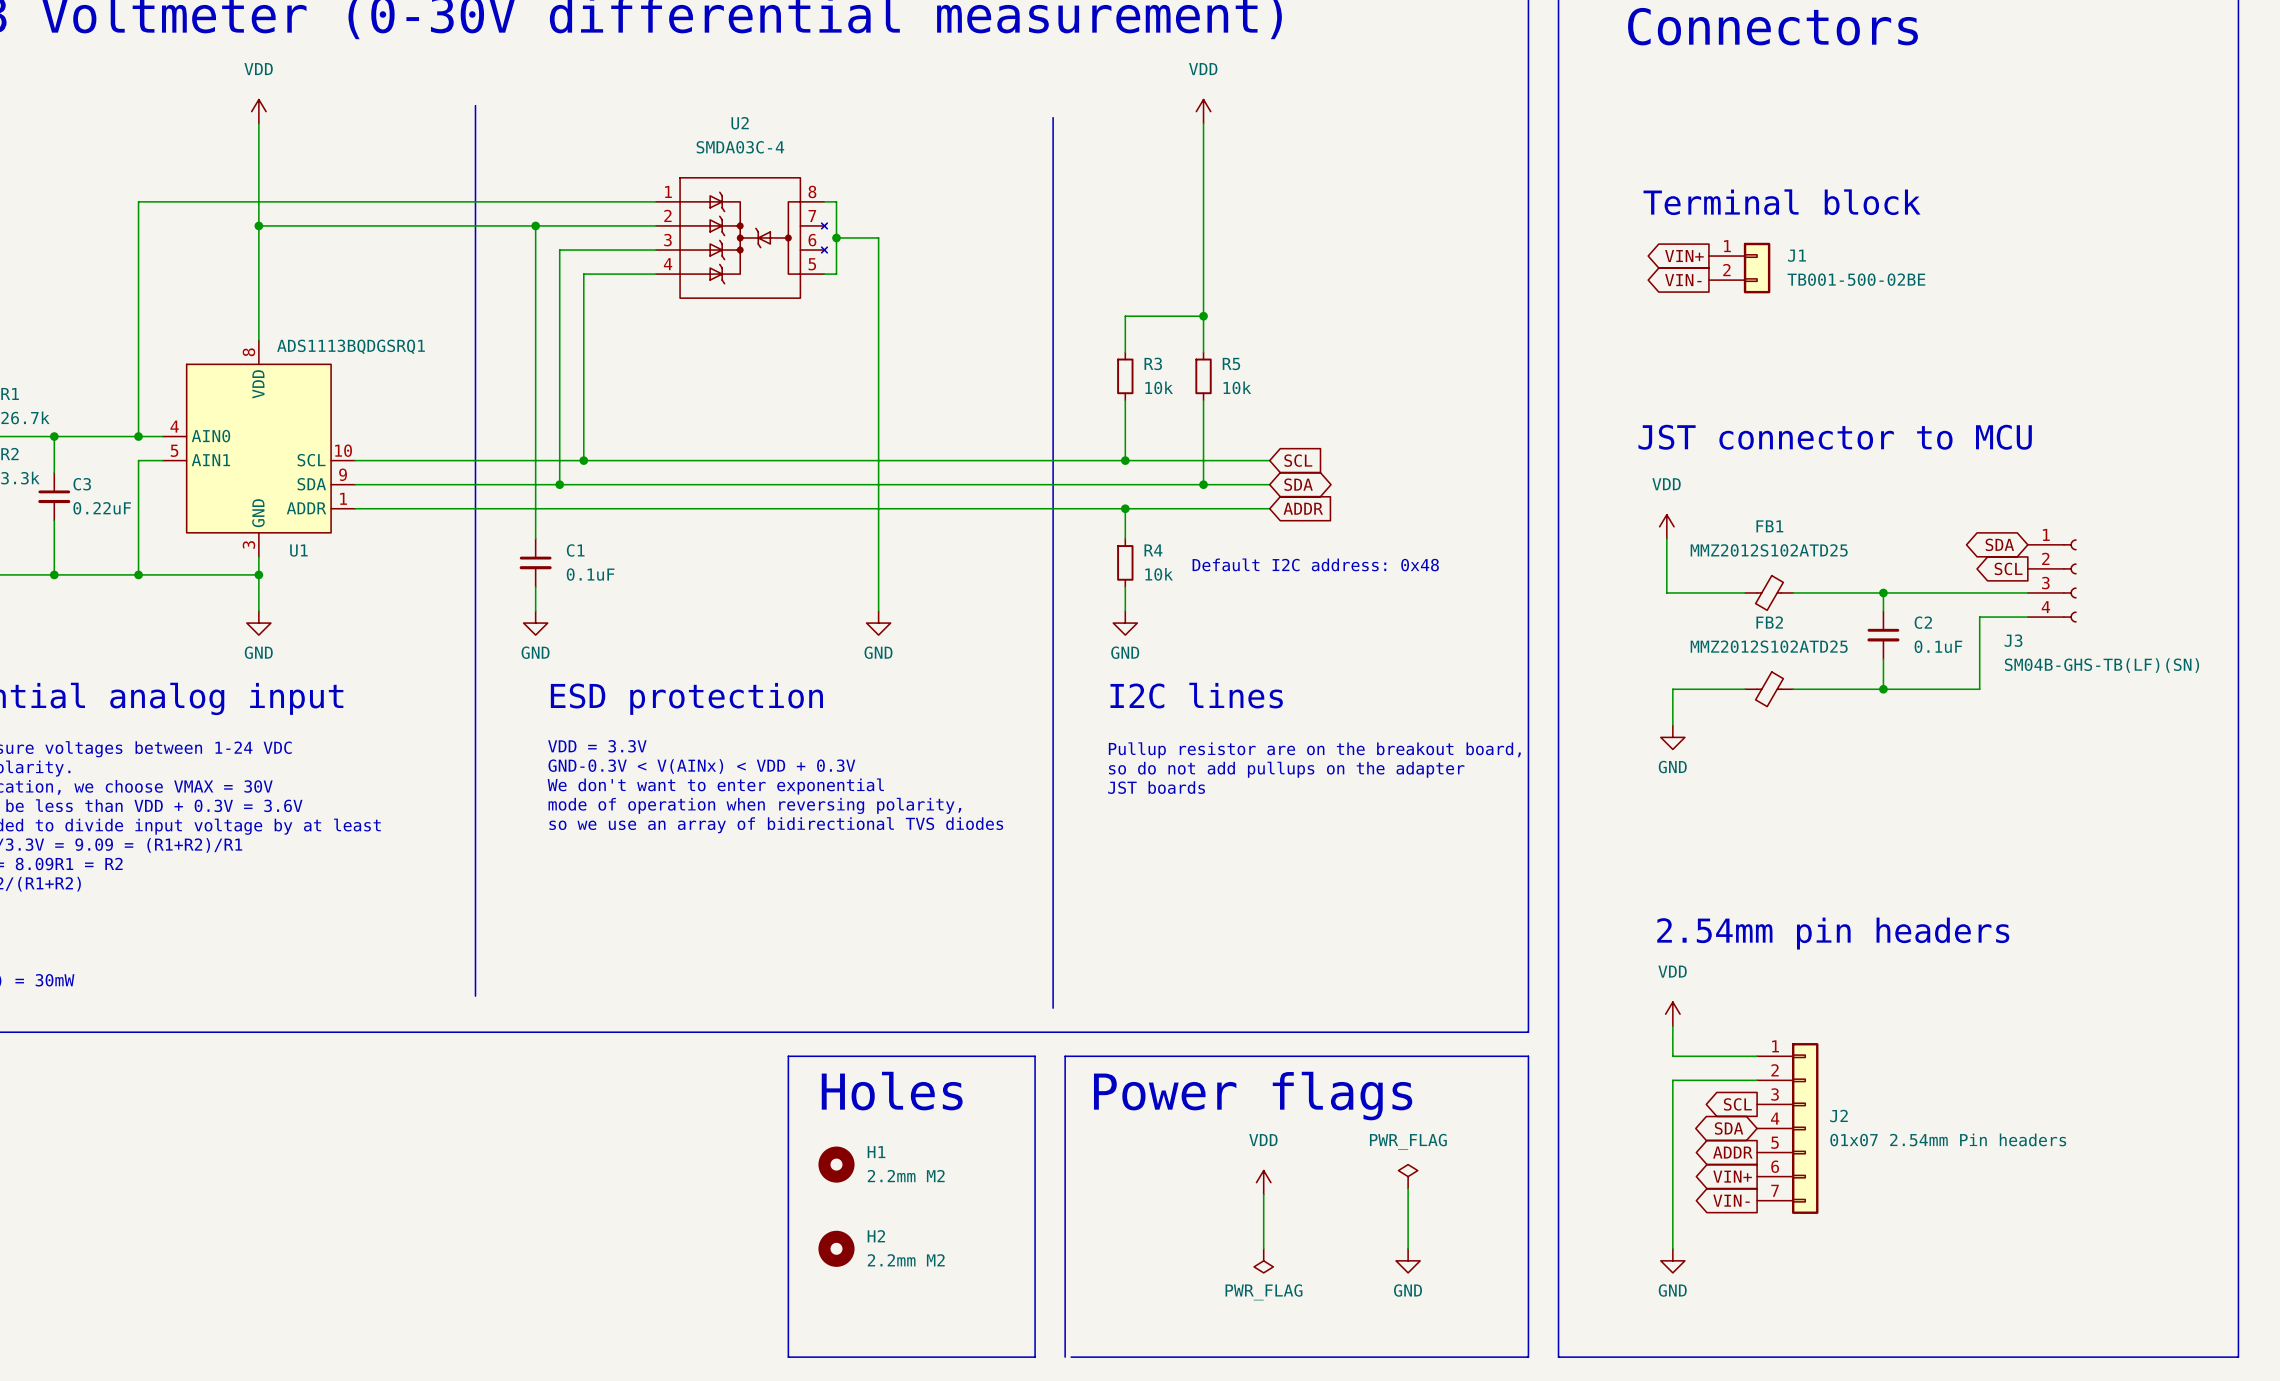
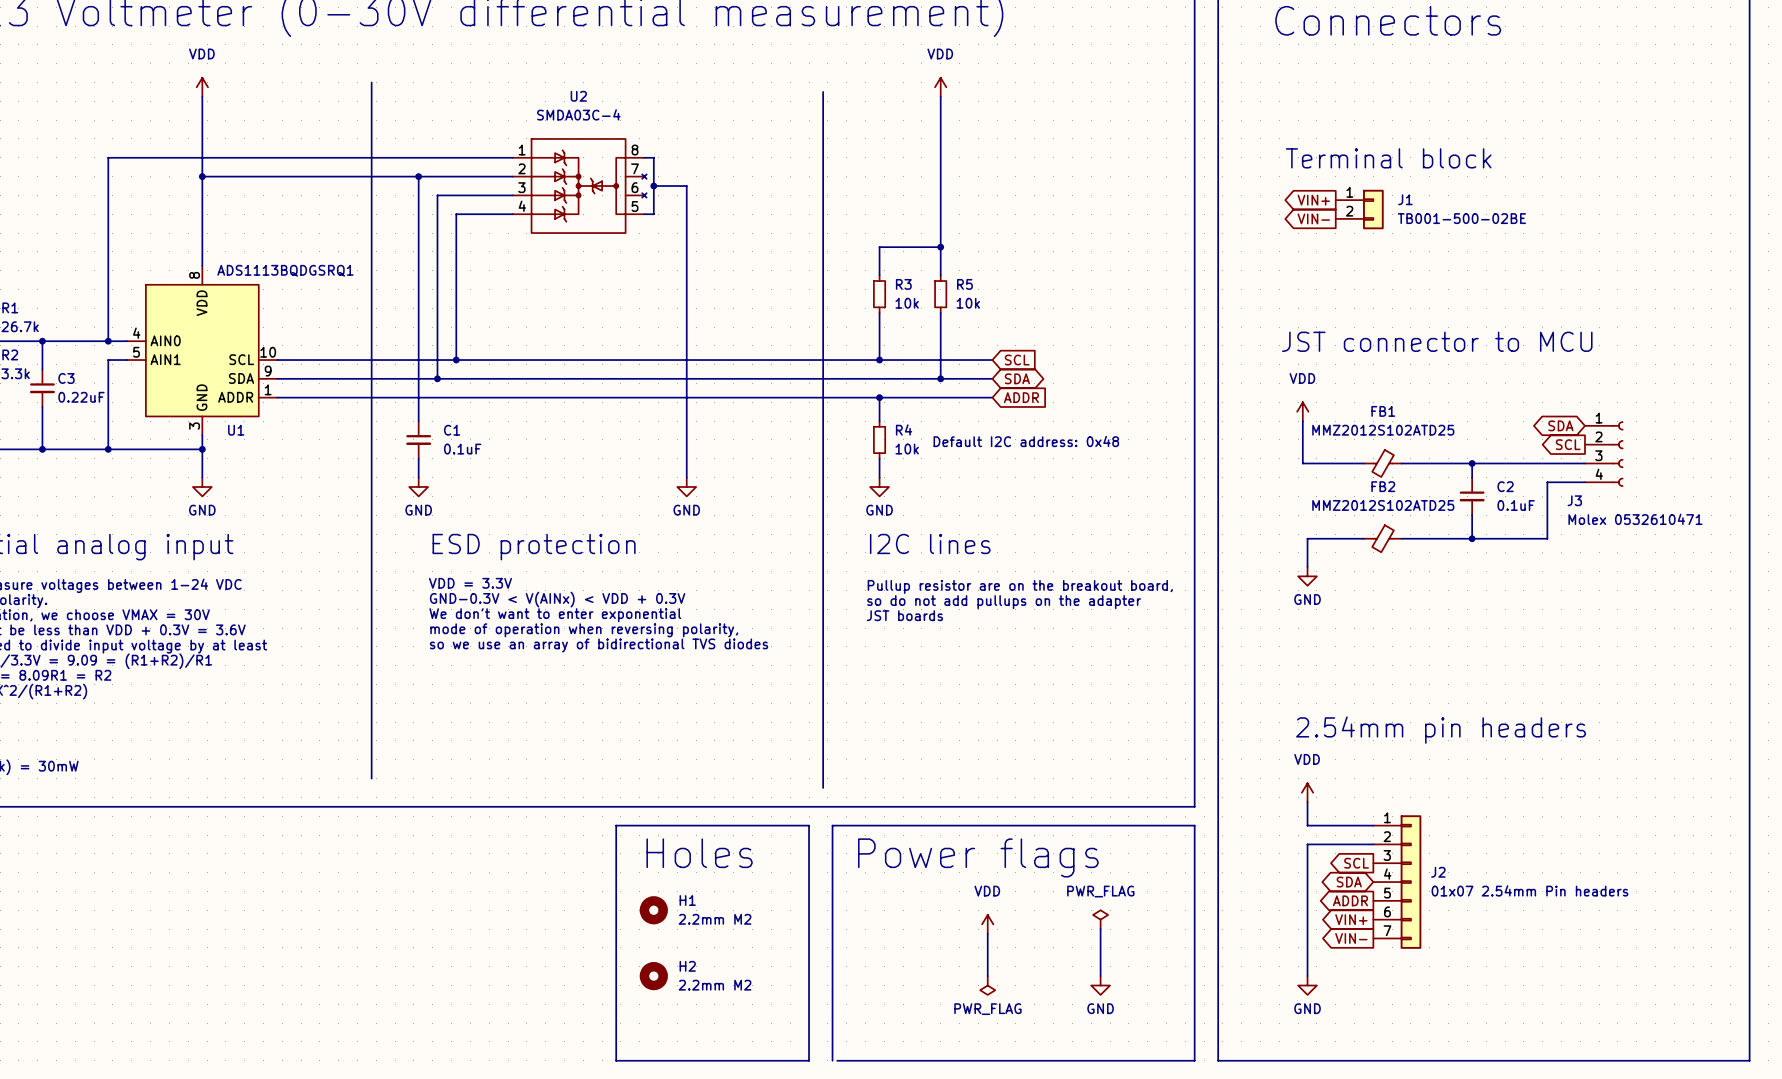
J3 value: SM04B-GHS-TB(LF)(SN) (2101, 665) -> Molex 0532610471 (1635, 519)

